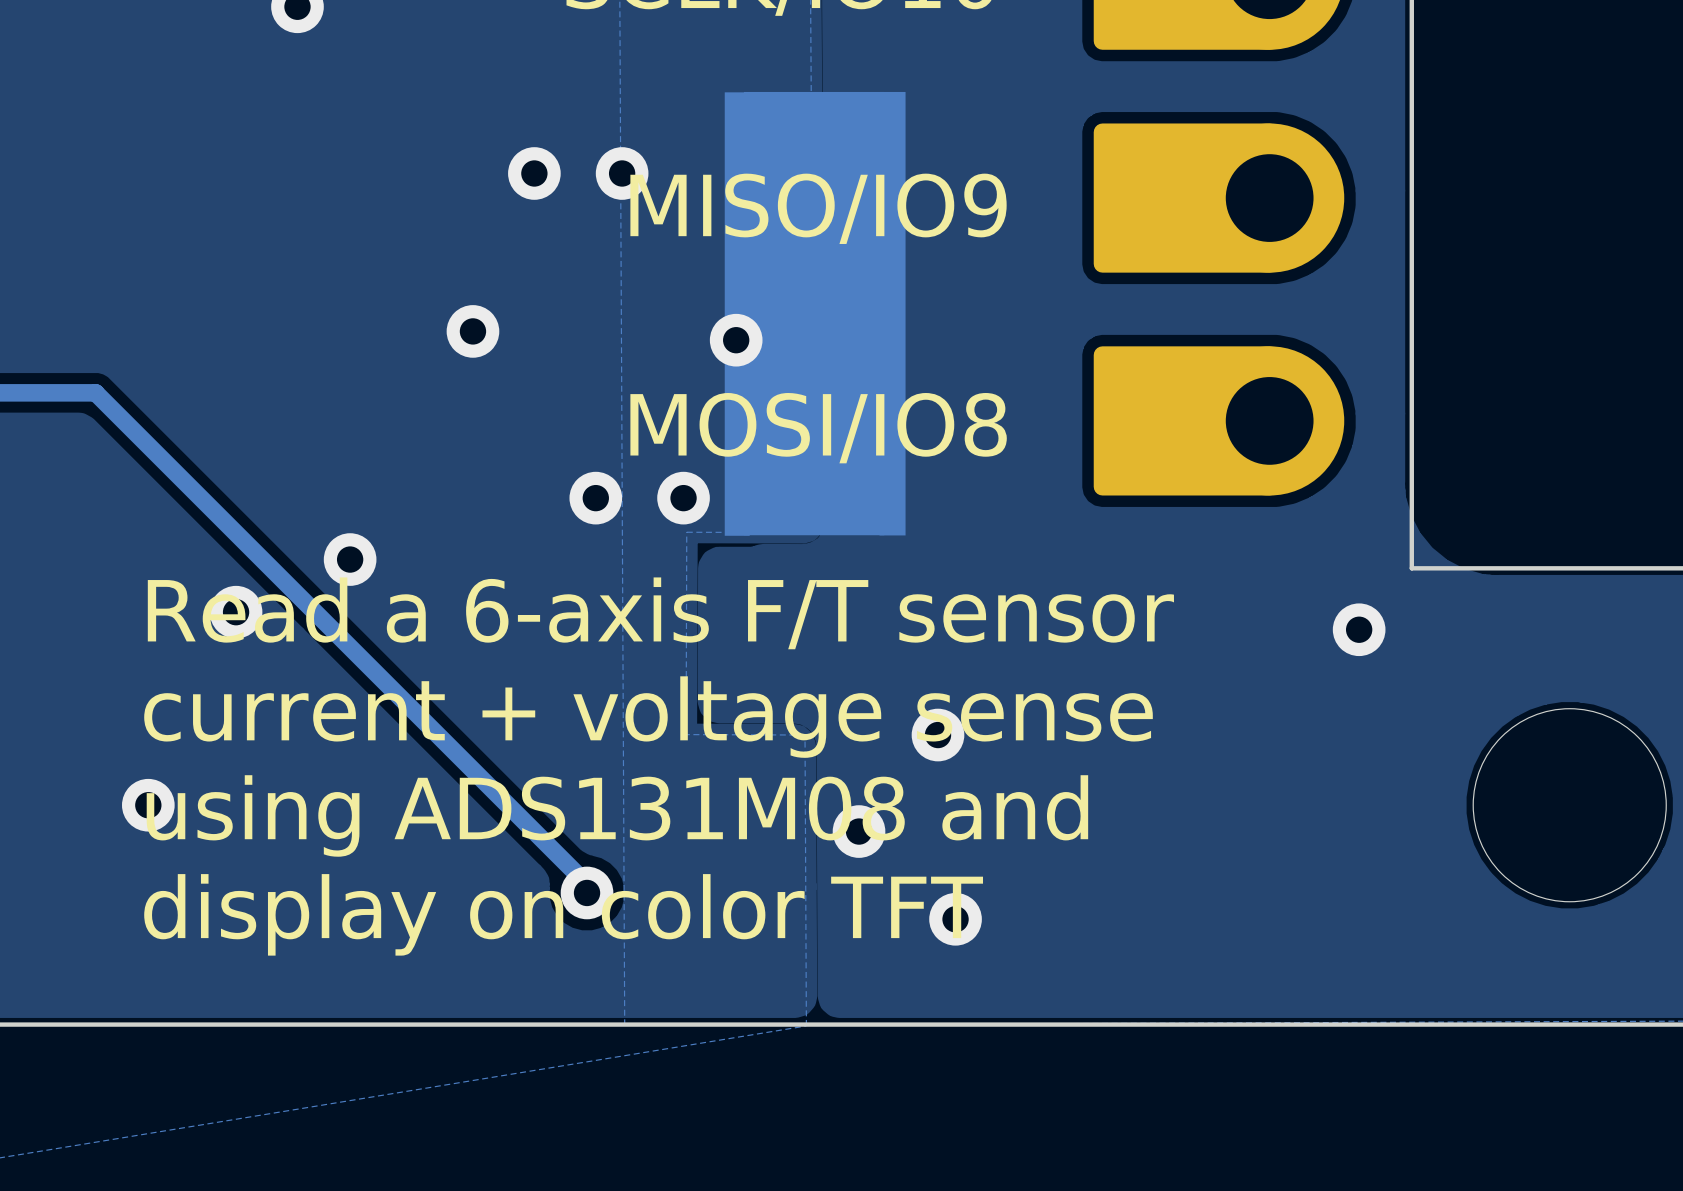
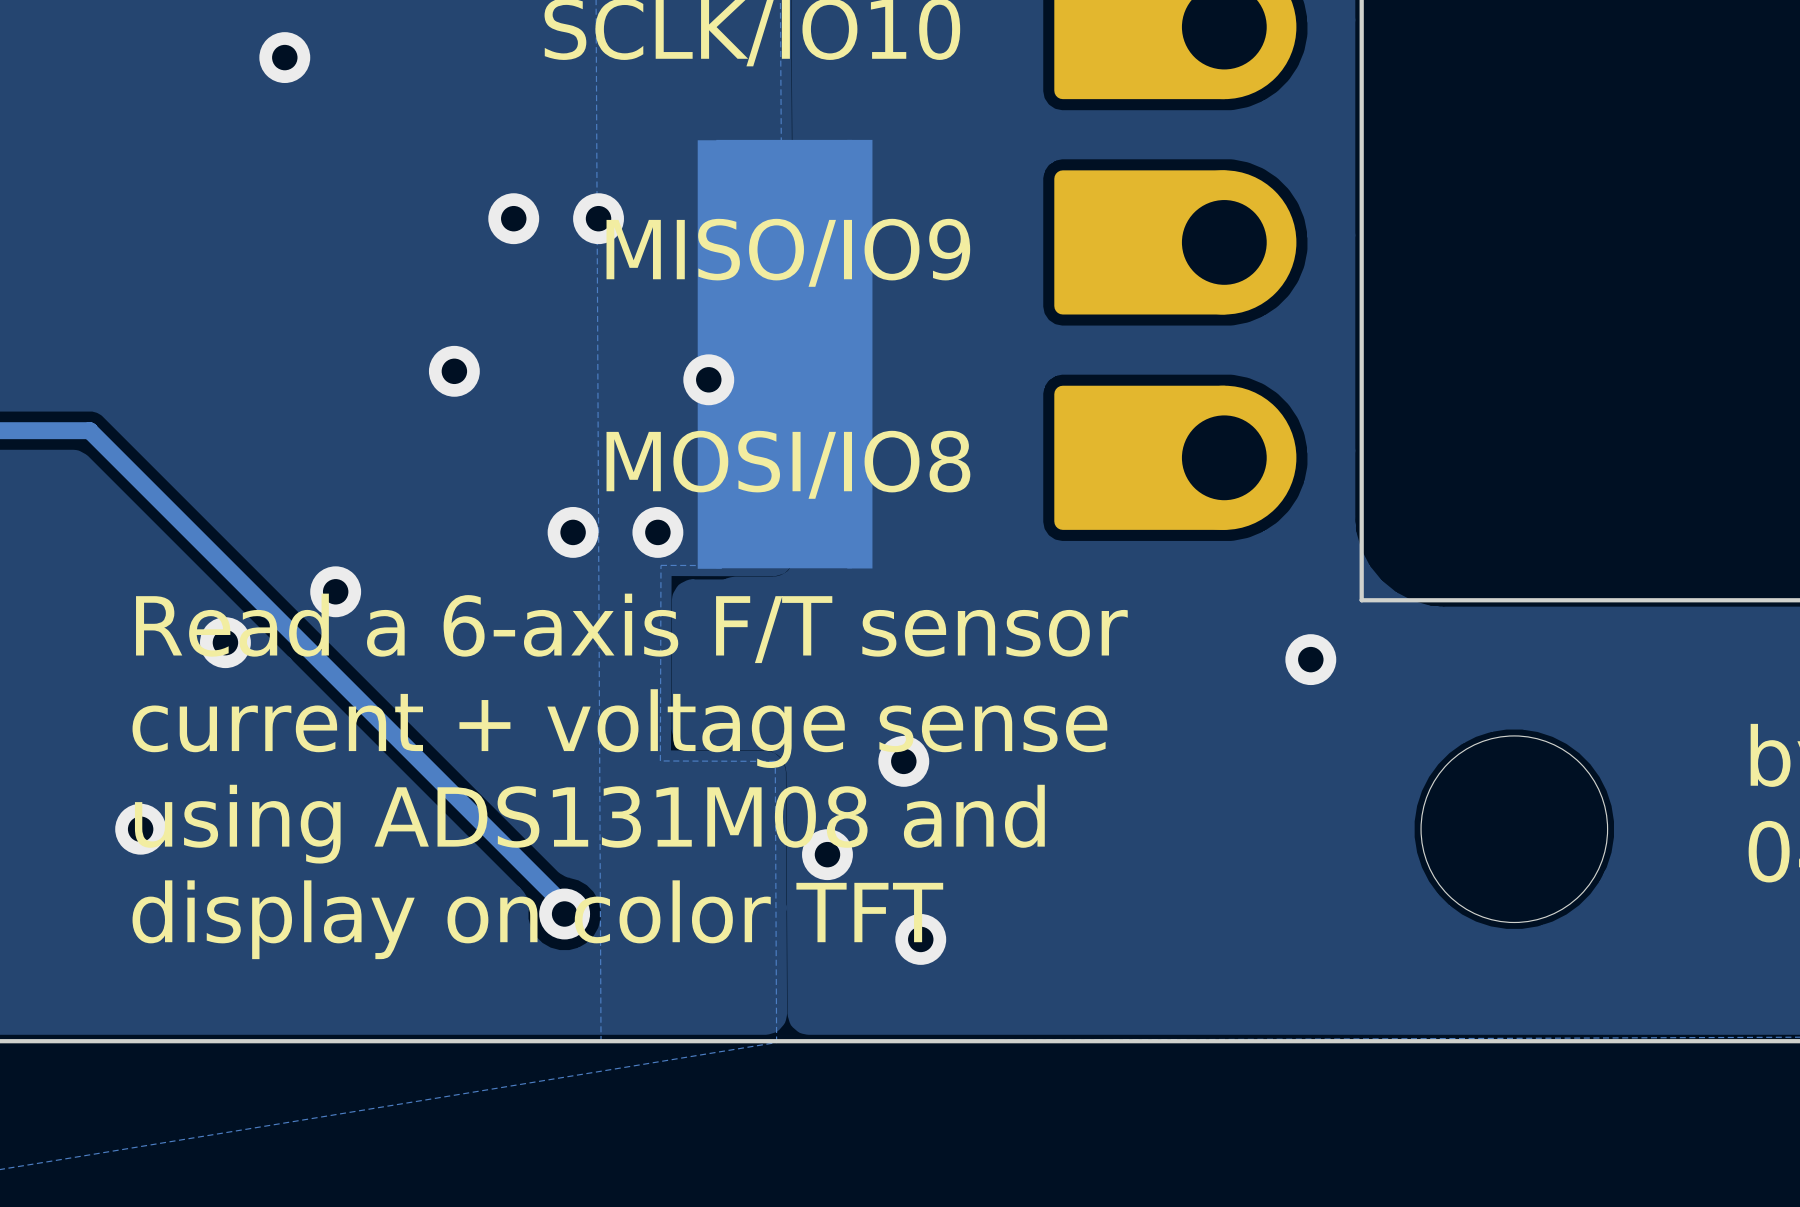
text position: Read a 6-axis F/T sensor (660, 613) -> Read a 6-axis F/T sensor (631, 628)
text position: current + voltage sense (648, 717) -> current + voltage sense (619, 728)
text position: using ADS131M08 and (617, 815) -> using ADS131M08 and (589, 824)
text position: display on color TFT (563, 914) -> display on color TFT (537, 919)

